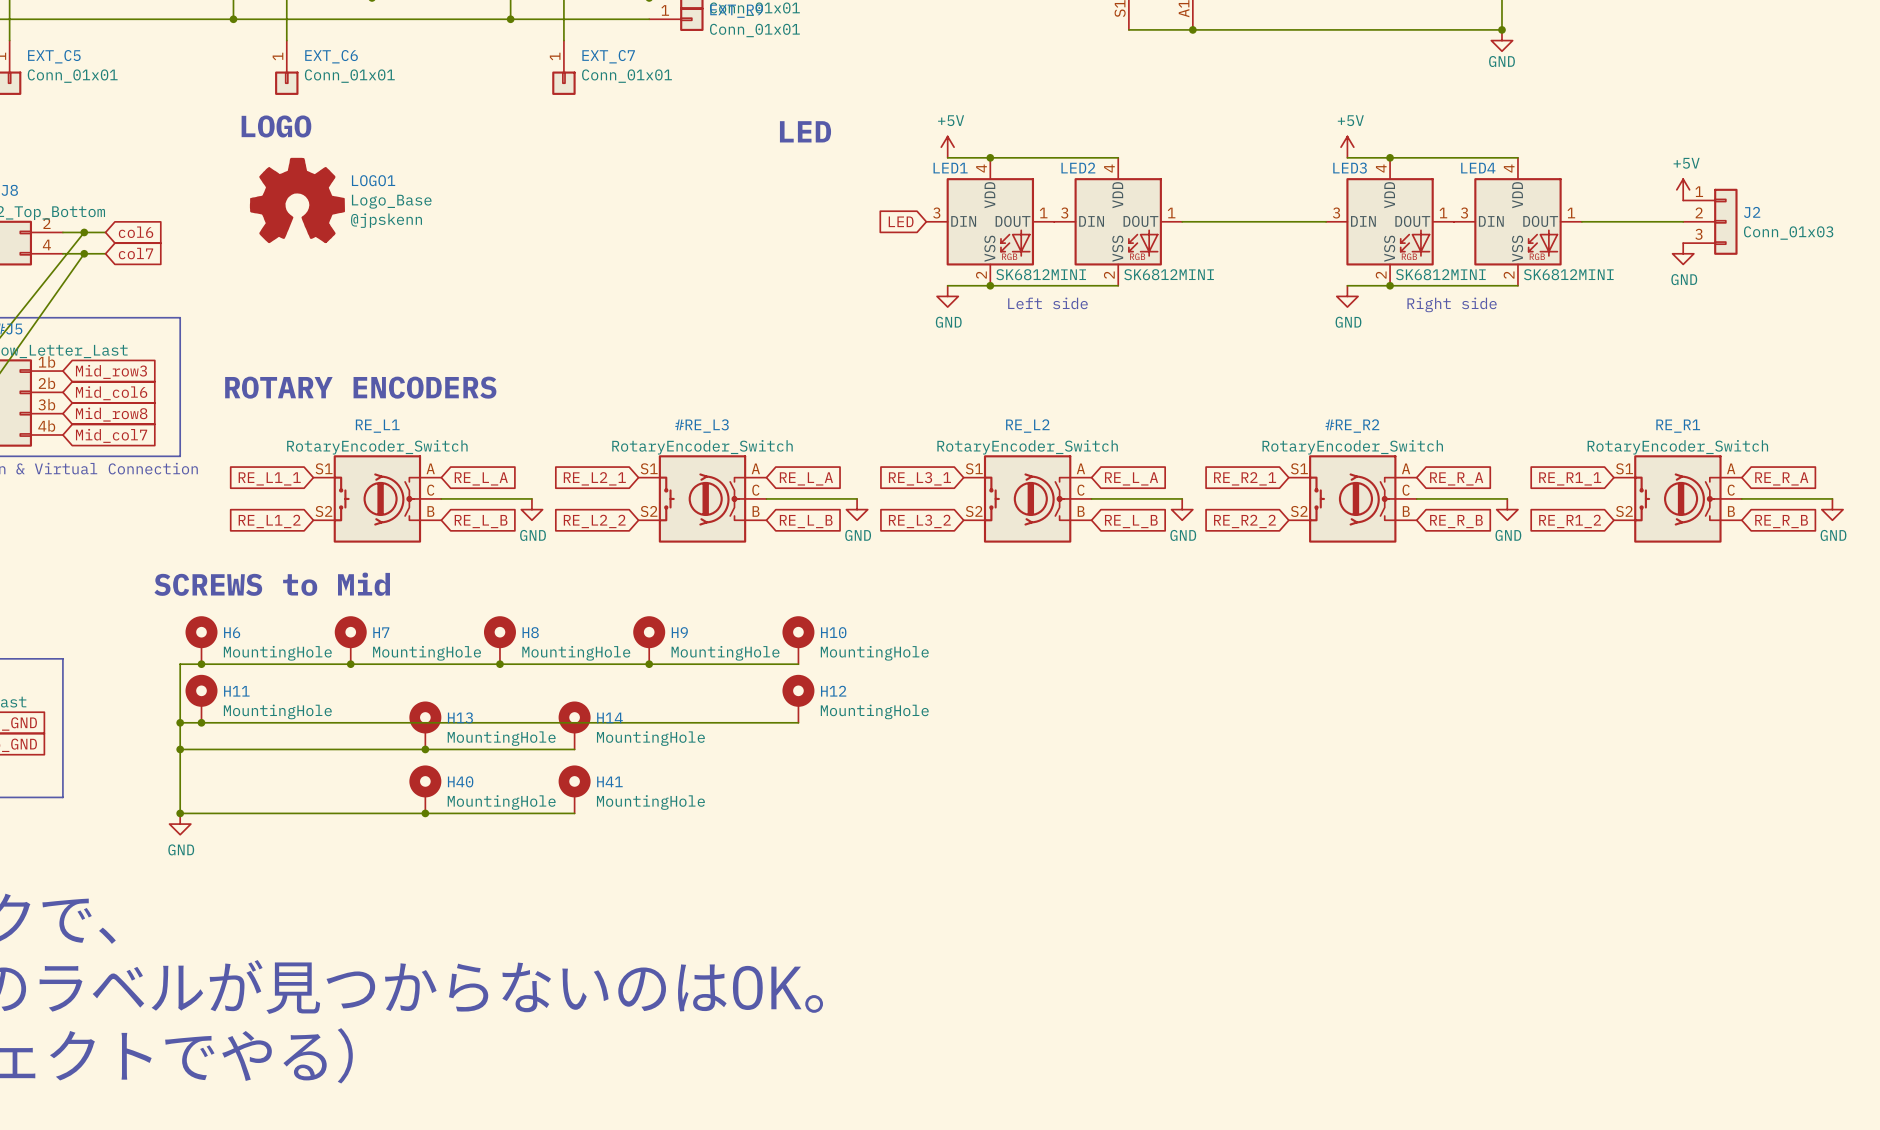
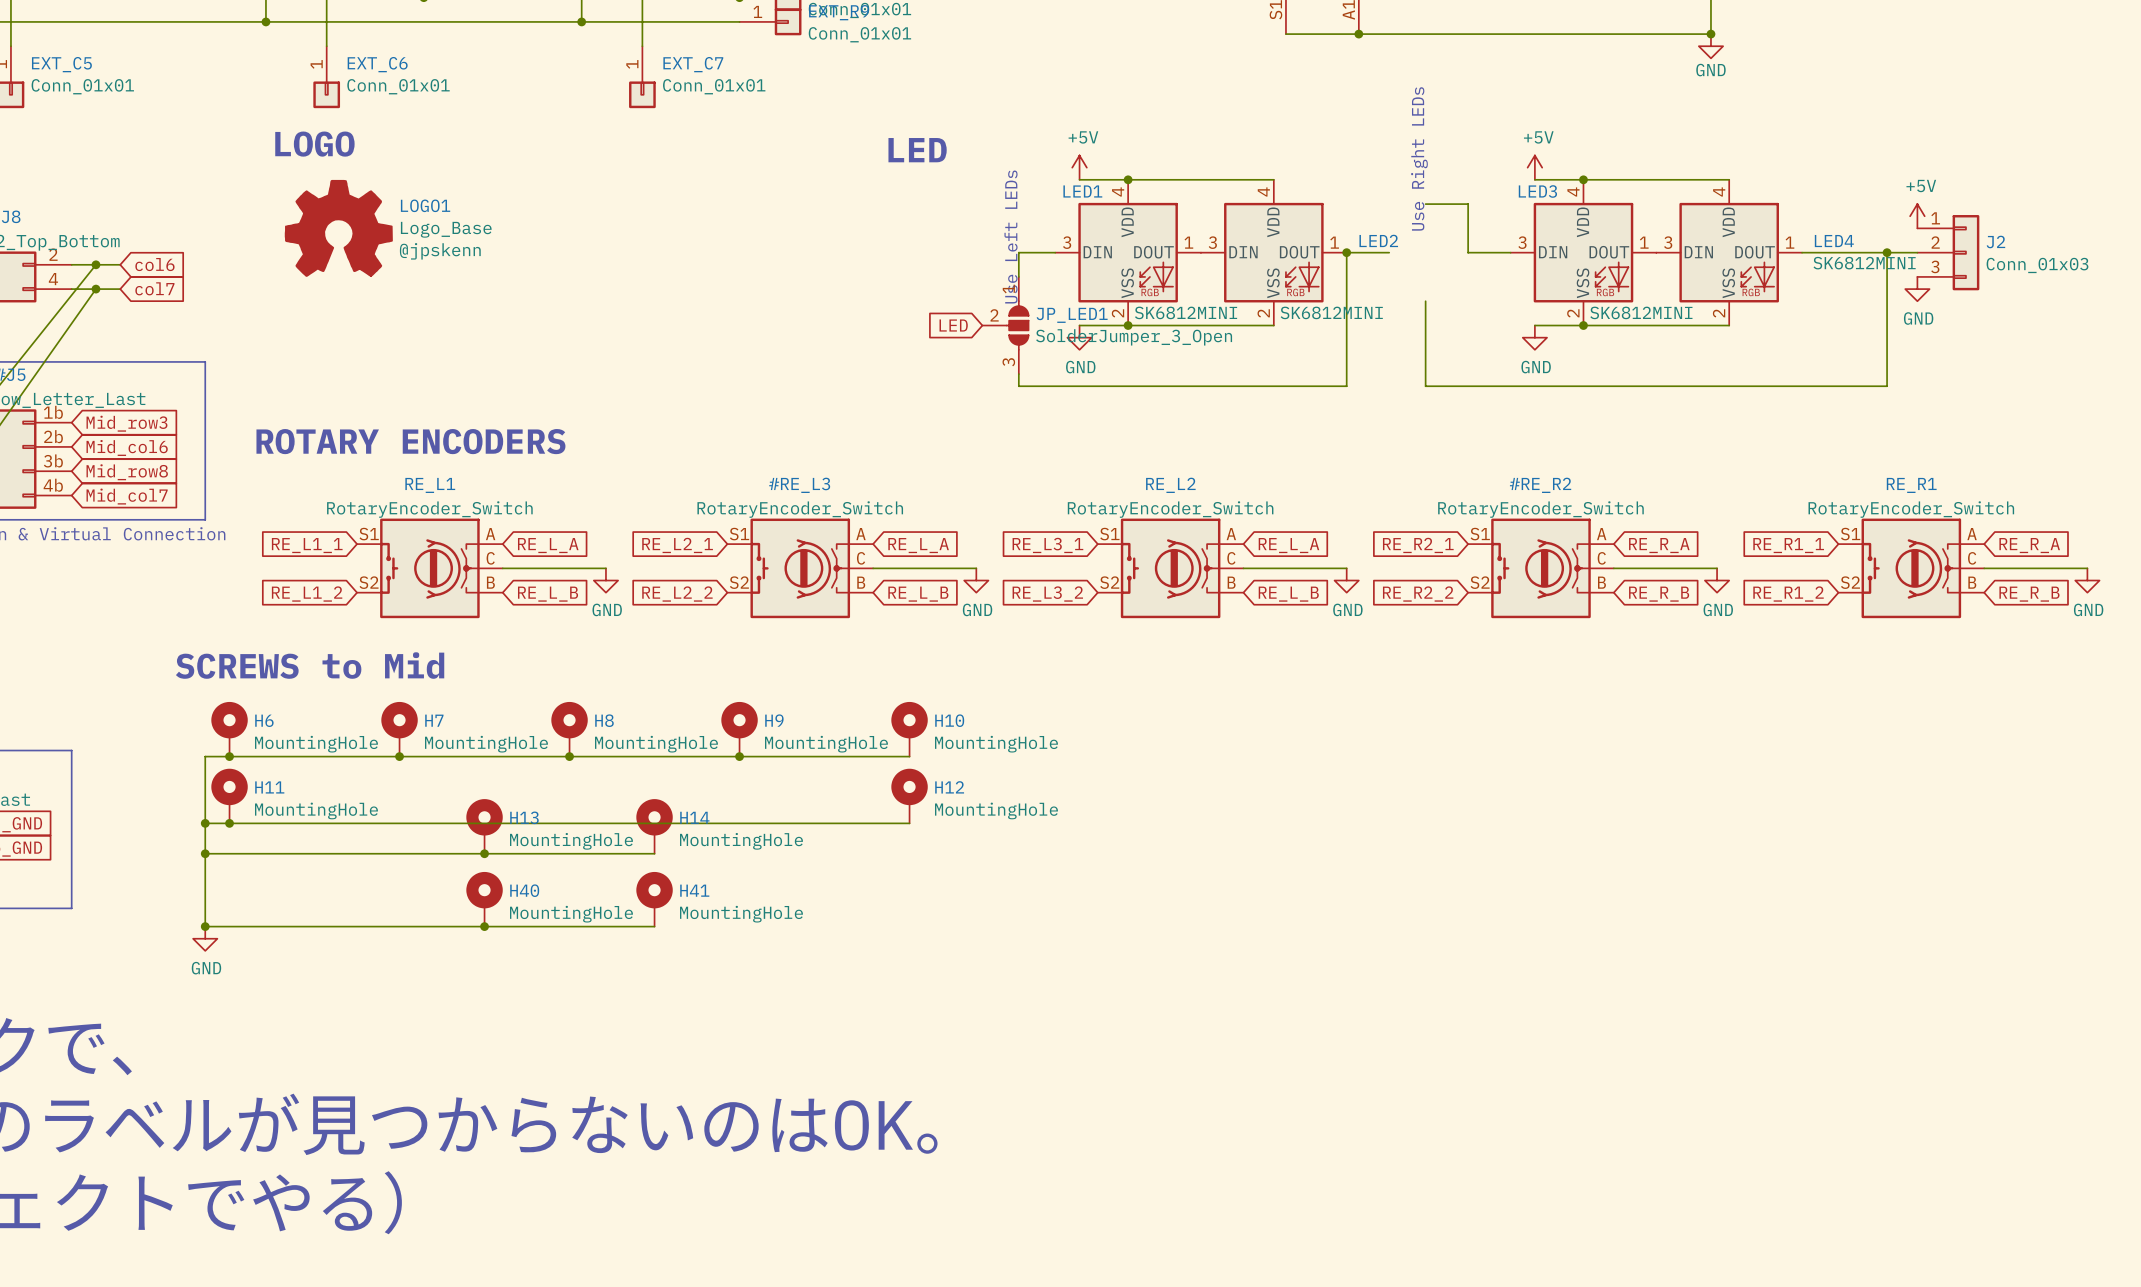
text: none -> Use Right LEDs (1419, 158)
LED2 name position: LED2 (1078, 168) -> LED2 (1378, 240)
LED4 name position: LED4 (1478, 168) -> LED4 (1834, 241)
text: none -> Use Left LEDs (1011, 237)
global label position: LED (901, 221) -> LED (953, 325)
wire: none -> (1055, 252) (1018, 252) (1018, 276)
wire: none -> (1346, 252) (1346, 386) (1018, 386) (1018, 374)
junction: none -> (1346, 252)
wire: (1219, 221) (1288, 221) -> (1425, 204) (1468, 204) (1468, 252)
wire: none -> (1887, 252) (1887, 386) (1425, 386) (1425, 301)
junction: none -> (1887, 252)
LED4 value position: SK6812MINI (1568, 274) -> SK6812MINI (1864, 263)
JP_LED1: none -> SolderJumper_3_Open (1005, 325)
text: Left side (1047, 303) -> none
text: Right side (1452, 304) -> none

